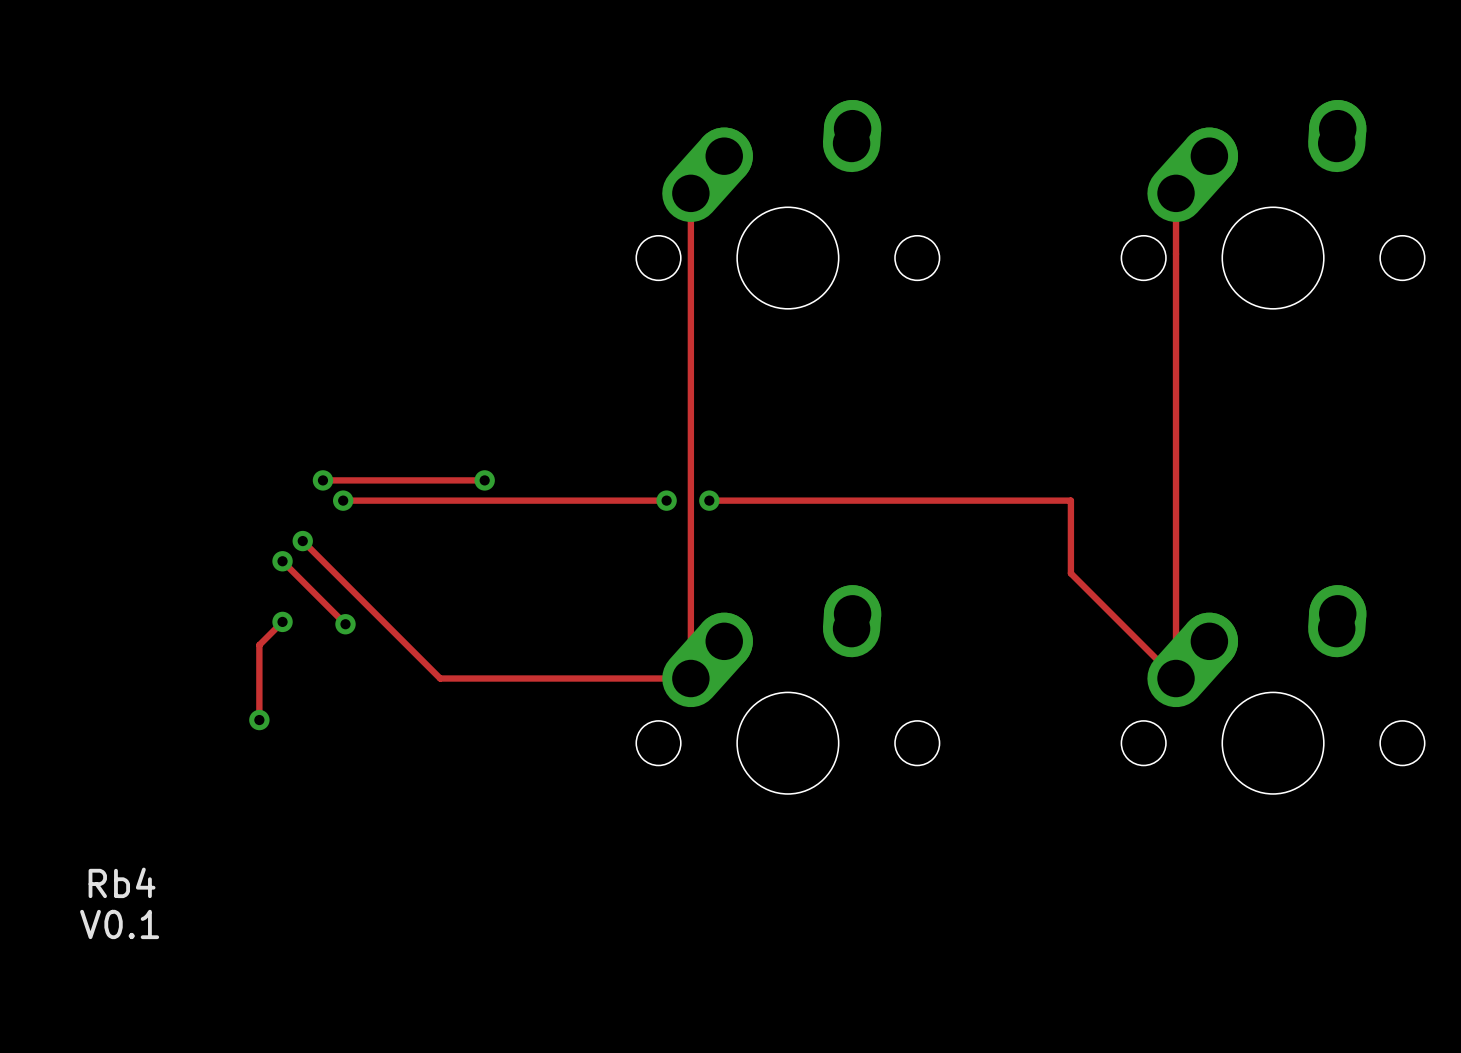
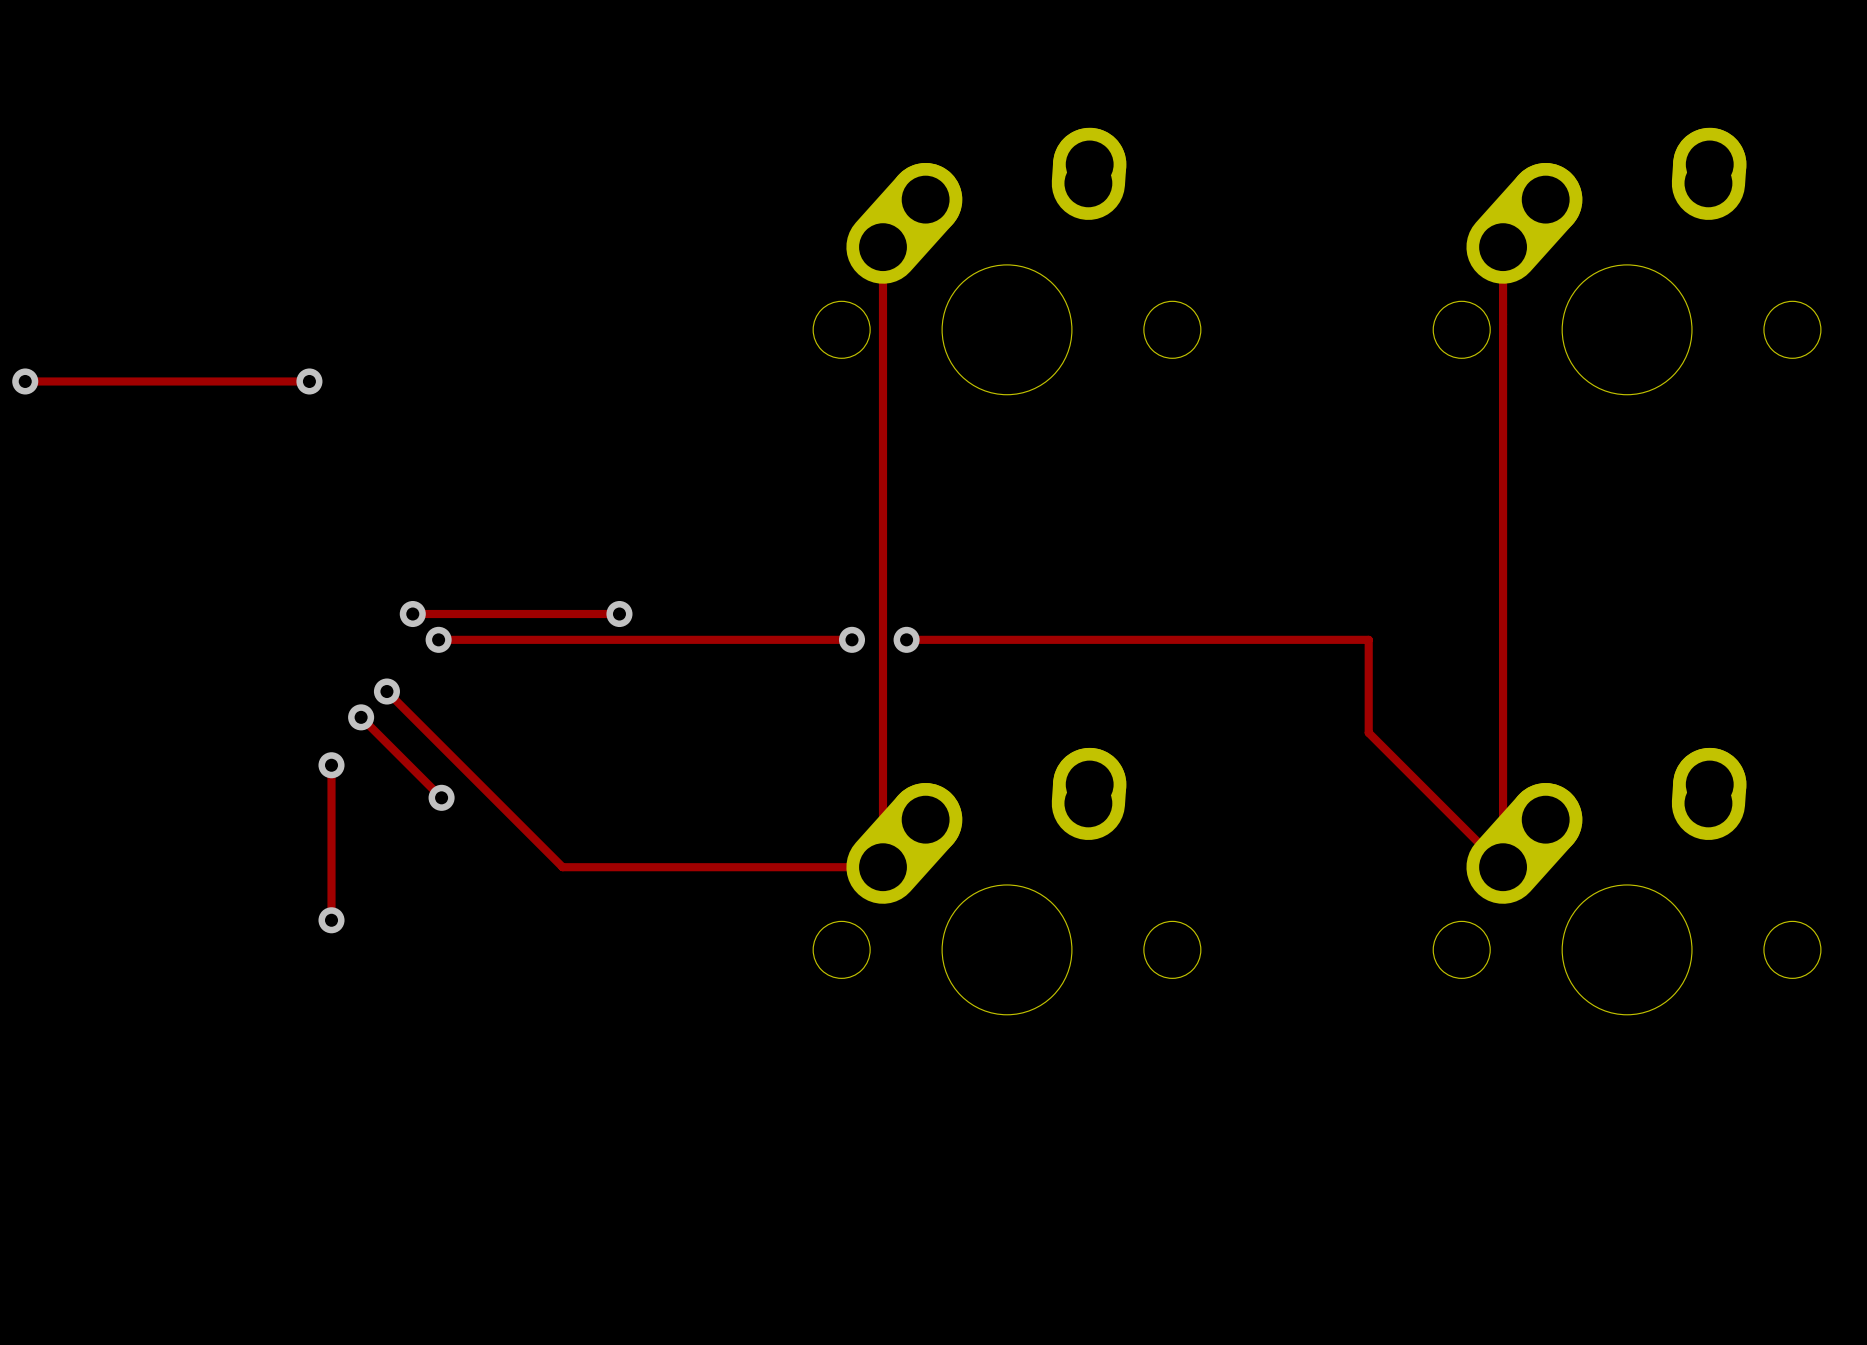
track: none -> (25, 381) (309, 381)
via: none -> (25, 381)
via: none -> (309, 381)
track: (282, 621) (259, 645) -> (331, 765) (331, 824)
via position: (282, 621) -> (331, 765)
text: Rb4 (122, 882) -> none
text: V0.1 (119, 924) -> none

